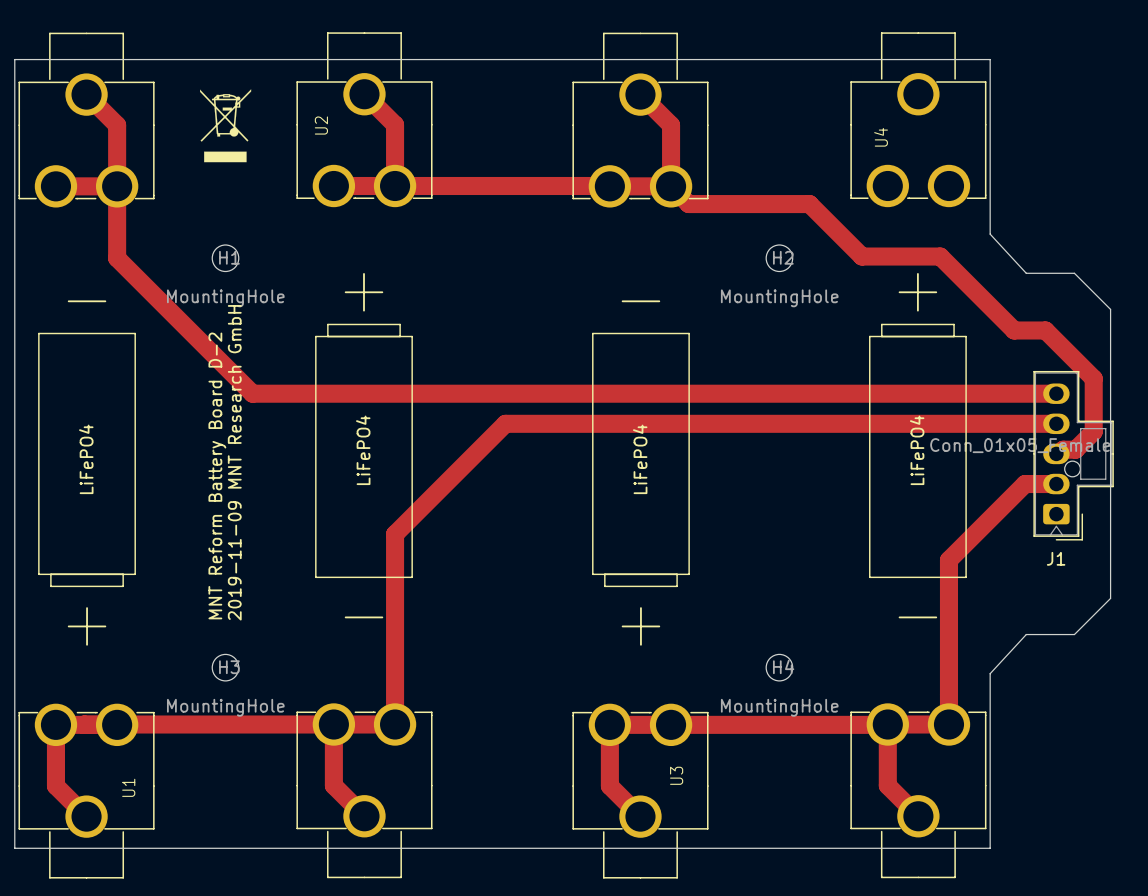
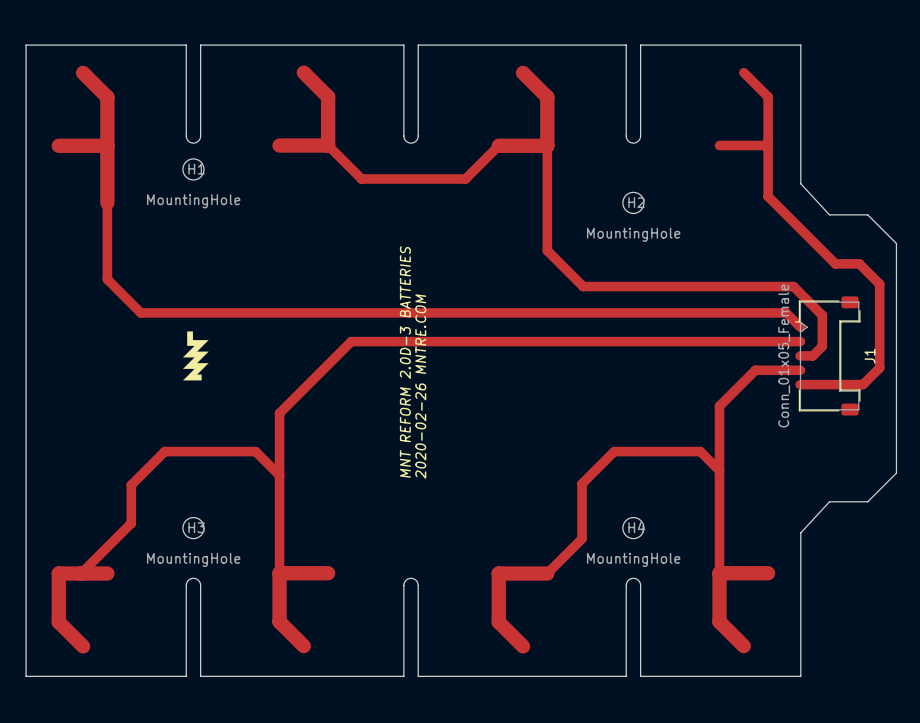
board edge: (216, 59) (234, 59) -> (186, 45) (186, 136) (188, 141) (193, 143) (198, 141) (200, 136) (200, 45)
board edge: (490, 59) (508, 59) -> (403, 45) (403, 136) (405, 141) (411, 143) (416, 141) (418, 136) (418, 45)
board edge: (770, 59) (788, 59) -> (626, 45) (626, 136) (628, 141) (633, 143) (638, 141) (640, 136) (640, 45)
drawing: [200, 89, 252, 163] -> none
track: none -> (743, 72) (768, 96) (768, 196) (835, 263) (859, 263) (879, 284) (879, 367) (862, 384) (800, 384)
track: (395, 185) (609, 186) -> (328, 145) (361, 178) (465, 178) (498, 145)
track: none -> (719, 145) (768, 145)
track: (671, 186) (688, 204) (809, 204) (862, 256) (940, 256) (1014, 330) (1045, 330) (1093, 378) (1093, 431) (1075, 449) (1063, 449) (1056, 453) -> (547, 145) (547, 250) (583, 286) (793, 286) (822, 315) (822, 346) (812, 355) (800, 355)
track: (117, 258) (252, 393) (1056, 393) -> (107, 202) (107, 279) (140, 312) (786, 312) (800, 327)
H1 position: (225, 258) -> (193, 169)
J1 footprint: [1033, 370, 1114, 541] -> [795, 296, 861, 416]
drawing: none -> [183, 331, 209, 381]
track: (1056, 423) (505, 423) (395, 534) (395, 724) -> none
U1: (86, 455) -> none
U2: (364, 455) -> none
U3: (640, 455) -> none
U4: (918, 455) -> none
text: none -> MNT REFORM 2.0D-3 BATTERIES (405, 361)
text: 2019-11-09 MNT Research GmbH (234, 462) -> none
track: none -> (800, 370) (755, 370) (719, 406) (719, 573)
text: MNT Reform Battery Board D-2 (217, 475) -> none
track: (1056, 484) (1025, 484) (948, 560) (948, 724) -> none
text: none -> 2020-02-26 MNTRE.COM (420, 386)
J1 name position: J1 (1056, 558) -> J1 (869, 356)
track: none -> (279, 475) (255, 451) (164, 451) (131, 485) (131, 523) (81, 573)
track: (84, 724) (333, 724) -> (800, 341) (351, 341) (279, 413) (279, 573)
track: (887, 724) (671, 724) -> (719, 470) (700, 451) (614, 451) (582, 483) (582, 538) (547, 573)
board edge: (14, 848) (990, 848) -> (26, 671) (26, 676) (186, 676) (186, 584) (188, 580) (193, 578) (198, 580) (200, 584) (200, 676) (403, 676) (403, 584) (405, 580) (411, 578) (416, 580) (418, 584) (418, 676) (626, 676) (626, 584) (628, 580) (633, 578) (638, 580) (640, 584) (640, 676) (800, 676) (800, 671)

